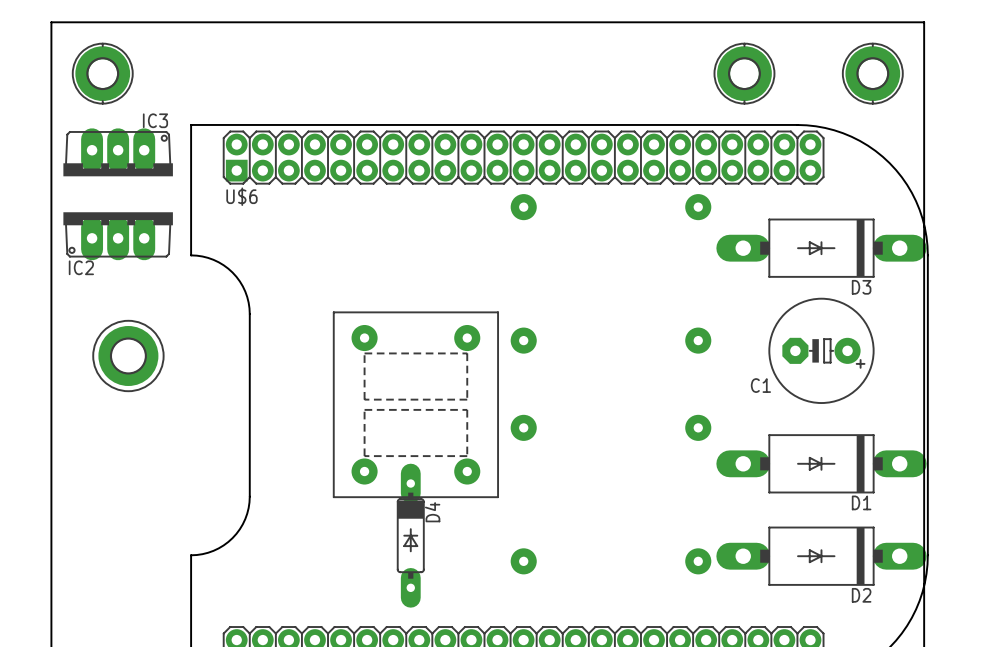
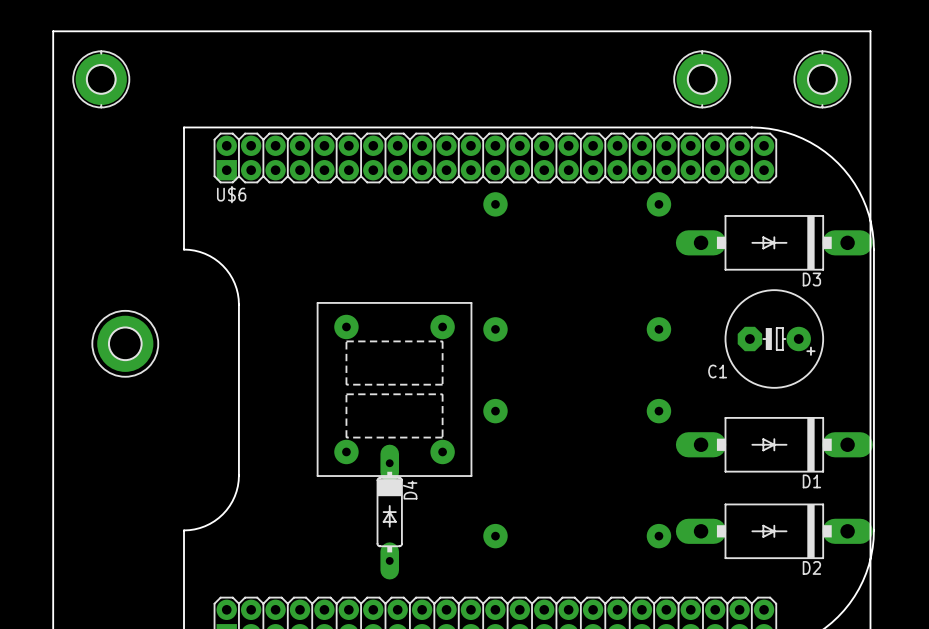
IC3: (118, 152) -> none
IC2: (118, 236) -> none

